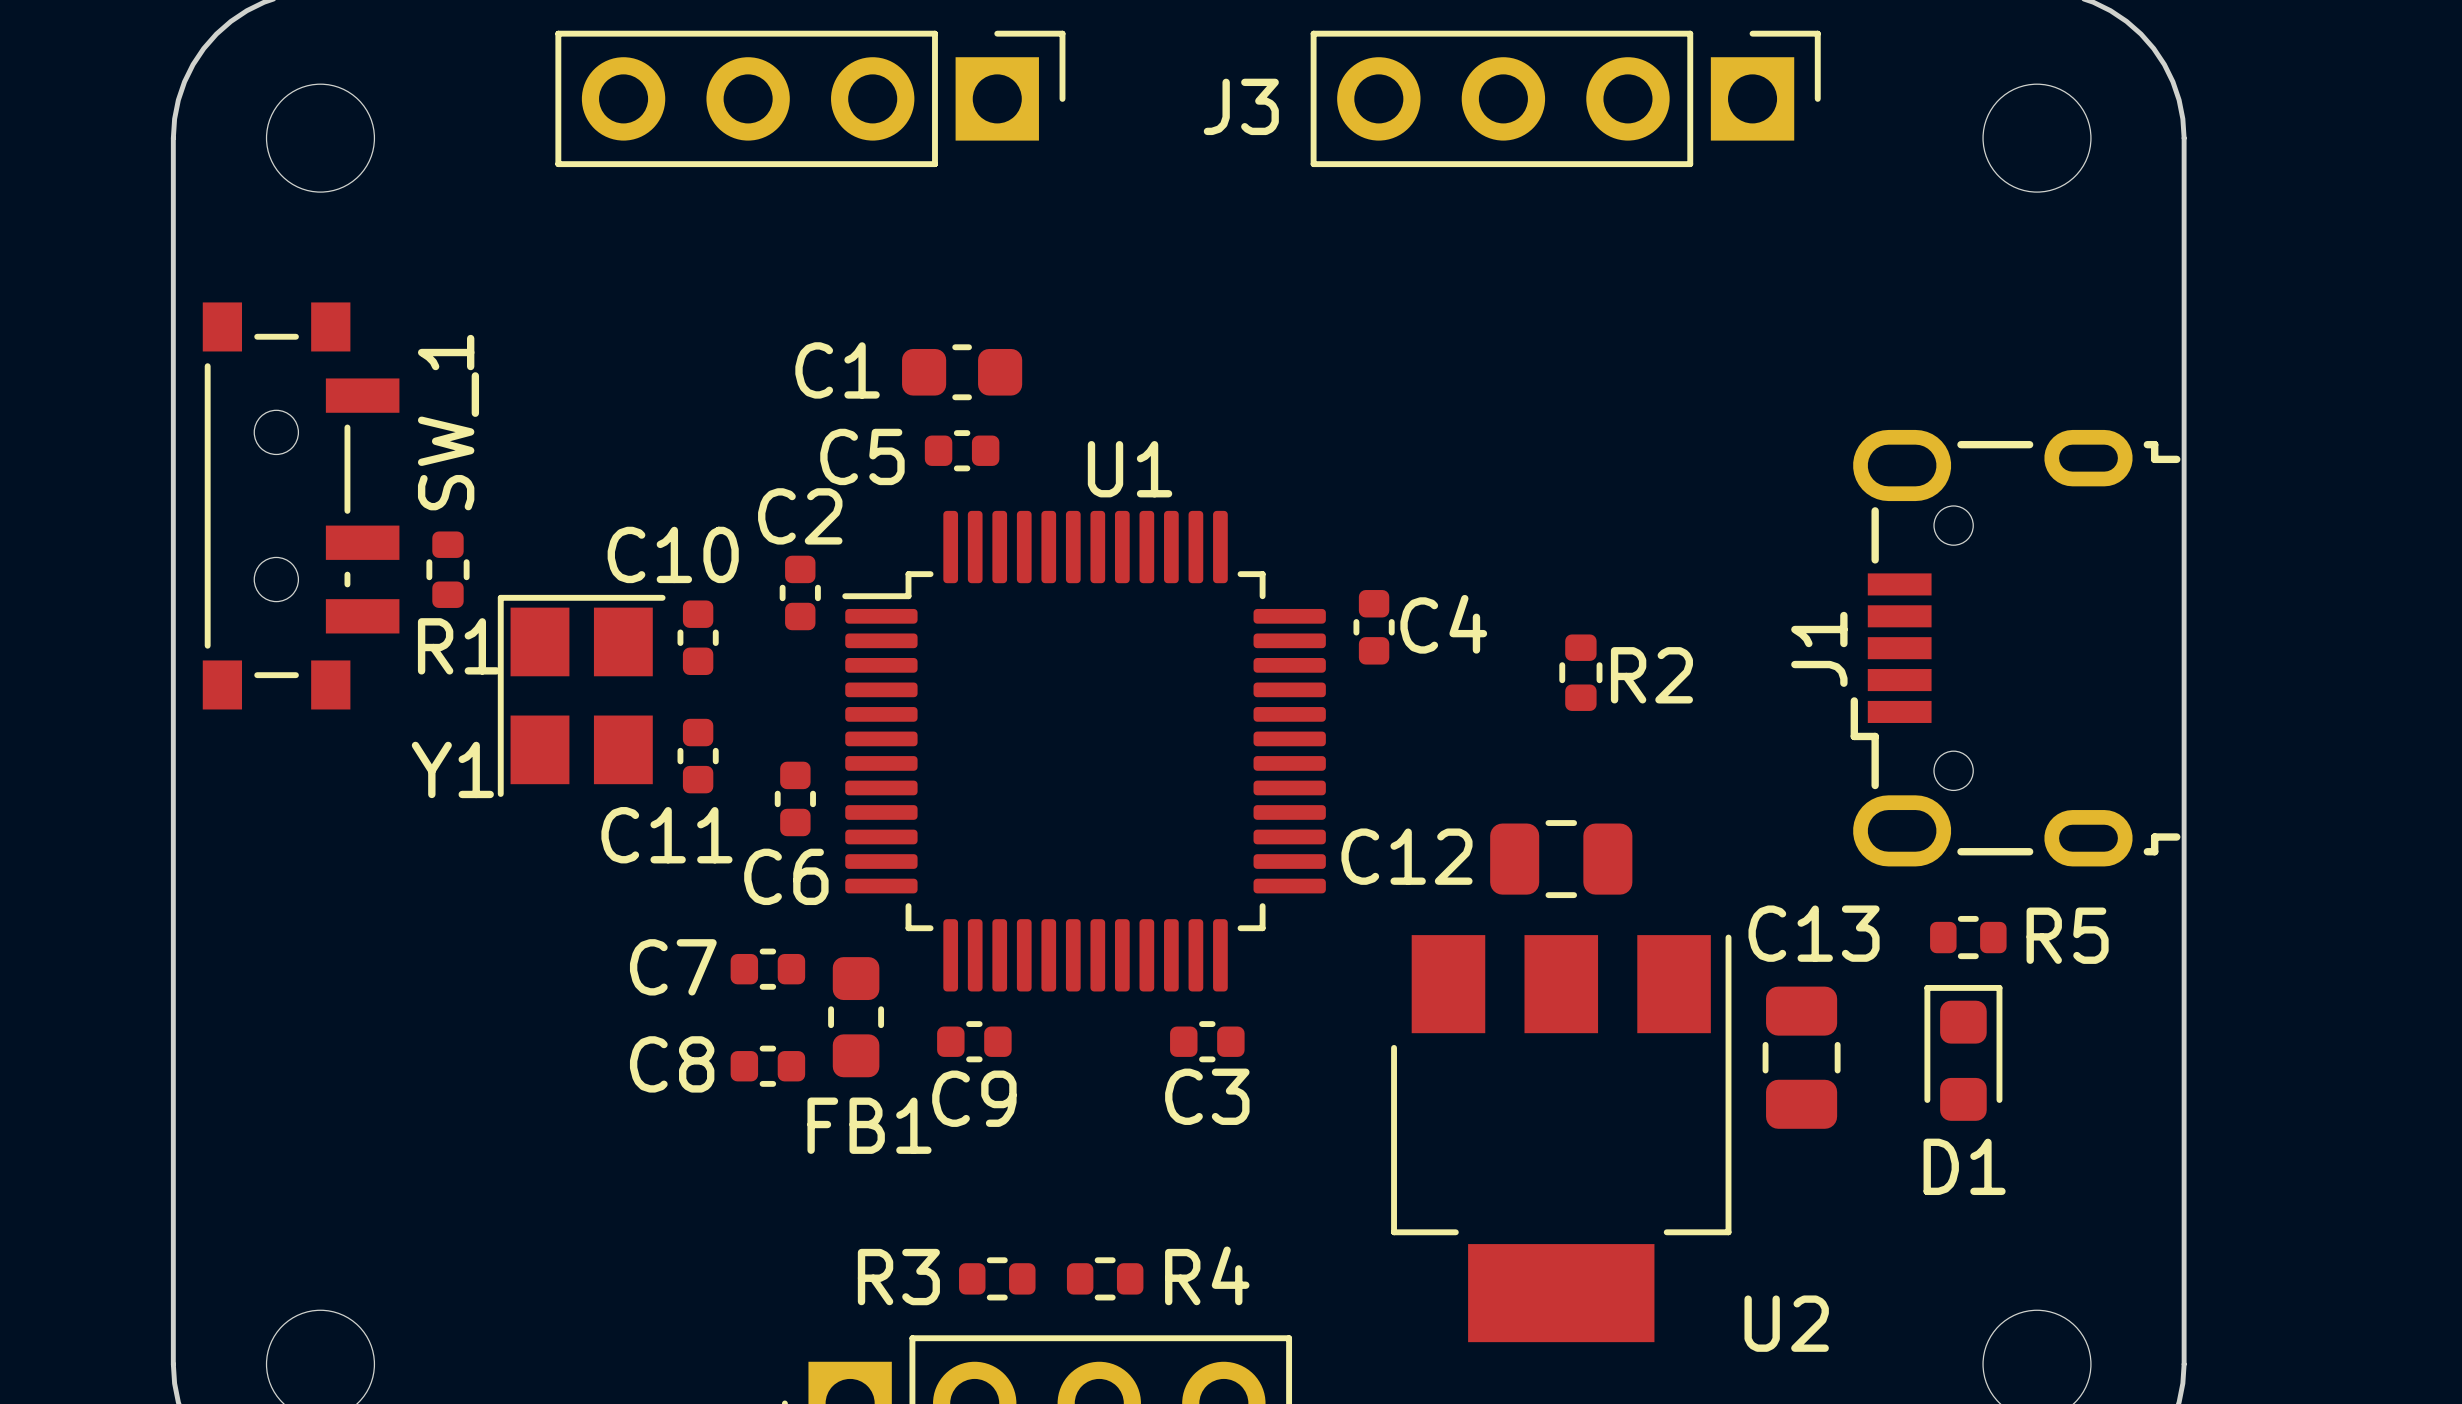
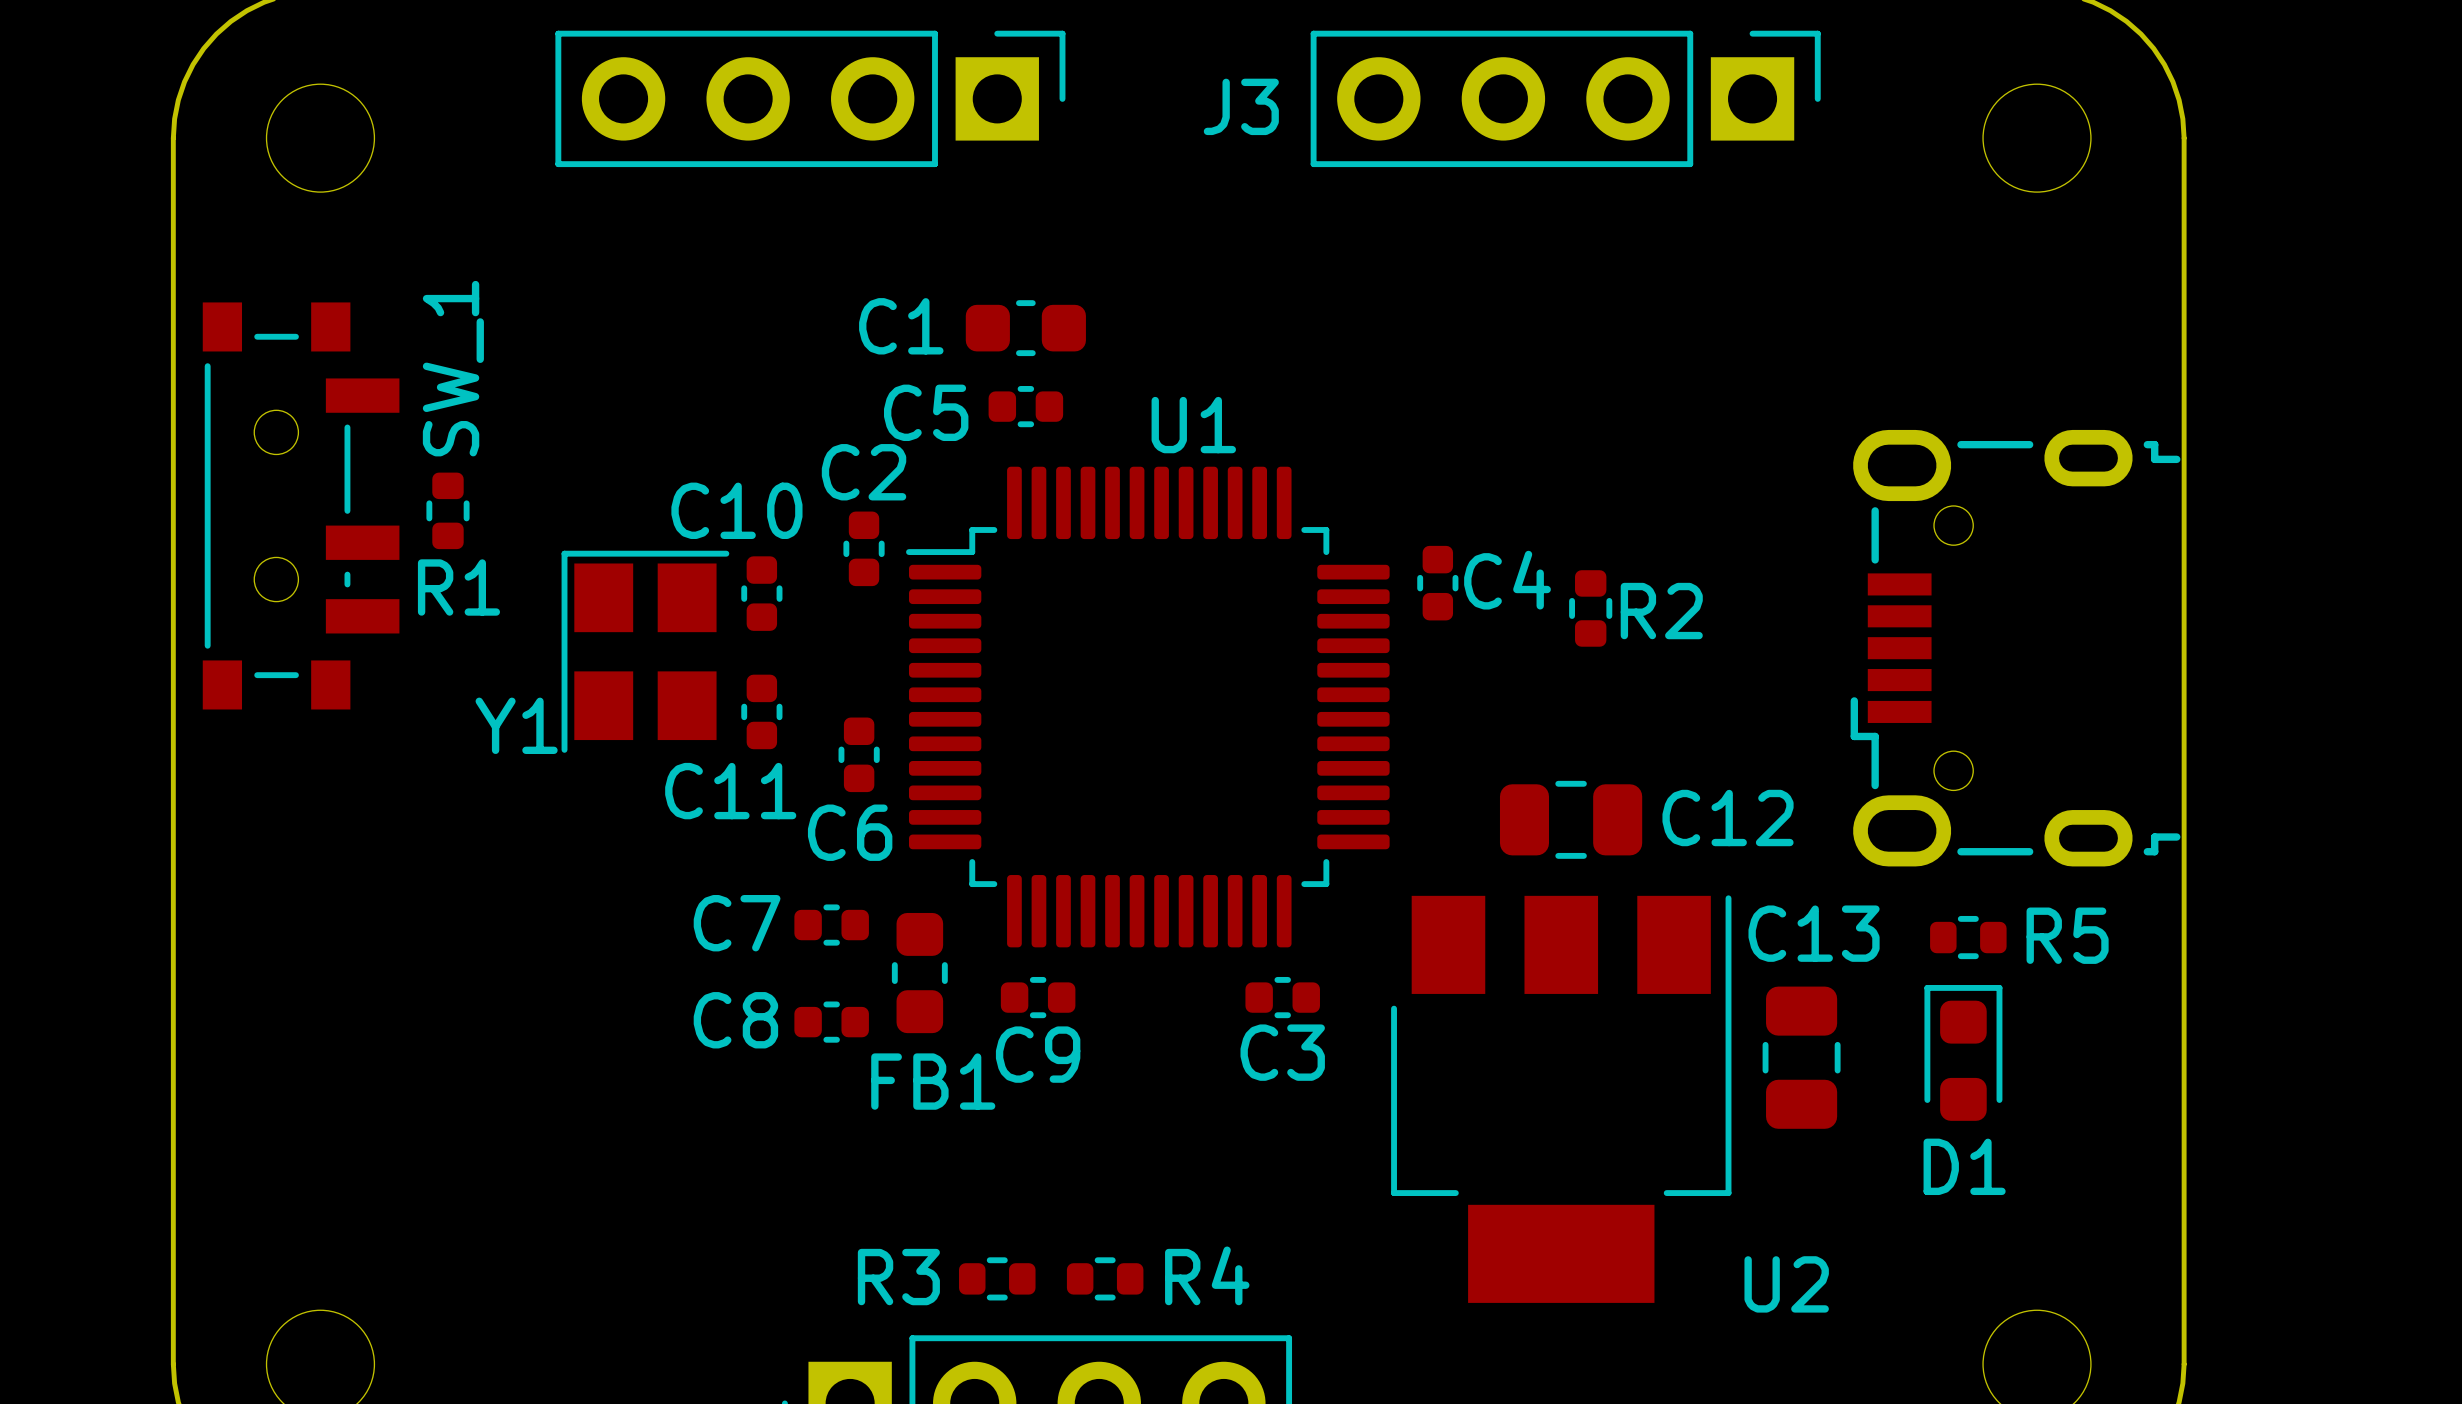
C1 position: (962, 372) -> (1025, 328)
SW_1 name position: SW_1 (448, 422) -> SW_1 (453, 368)
C5 position: (962, 450) -> (1025, 406)
R1 position: (447, 569) -> (447, 510)
C2 position: (800, 592) -> (864, 548)
C4 position: (1374, 627) -> (1437, 583)
C10 position: (698, 637) -> (761, 593)
J1 name: J1 (1819, 649) -> none
R2 position: (1580, 672) -> (1590, 608)
Y1 position: (581, 695) -> (645, 651)
U1 position: (1084, 751) -> (1147, 707)
C11 position: (698, 756) -> (761, 711)
C6 position: (795, 798) -> (859, 754)
C12 name position: C12 (1406, 856) -> C12 (1728, 818)
C12 position: (1561, 859) -> (1571, 819)
C7 position: (767, 969) -> (831, 925)
FB1 position: (856, 1017) -> (919, 973)
C9 position: (974, 1041) -> (1038, 997)
C3 position: (1207, 1041) -> (1282, 997)
C8 position: (767, 1066) -> (831, 1022)
U2 position: (1561, 1138) -> (1561, 1099)

